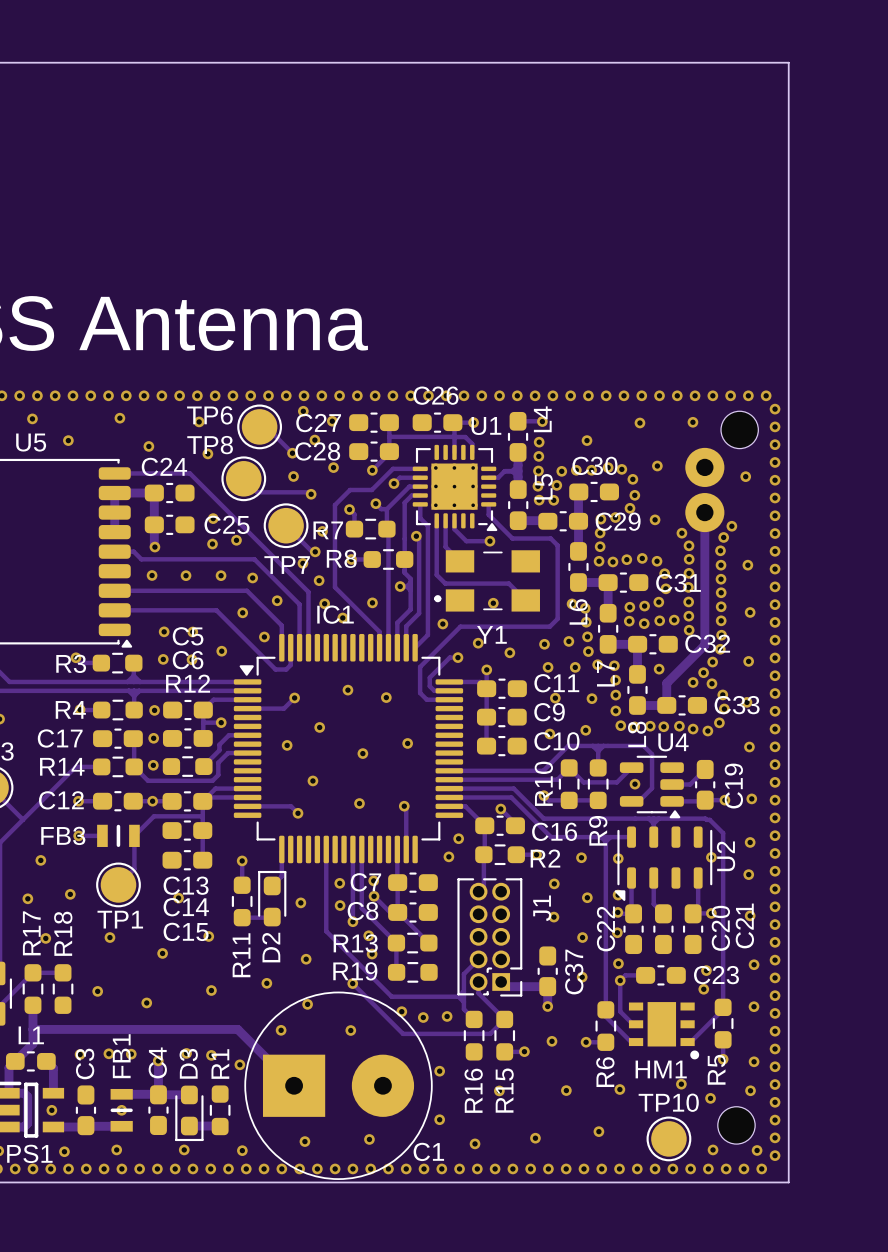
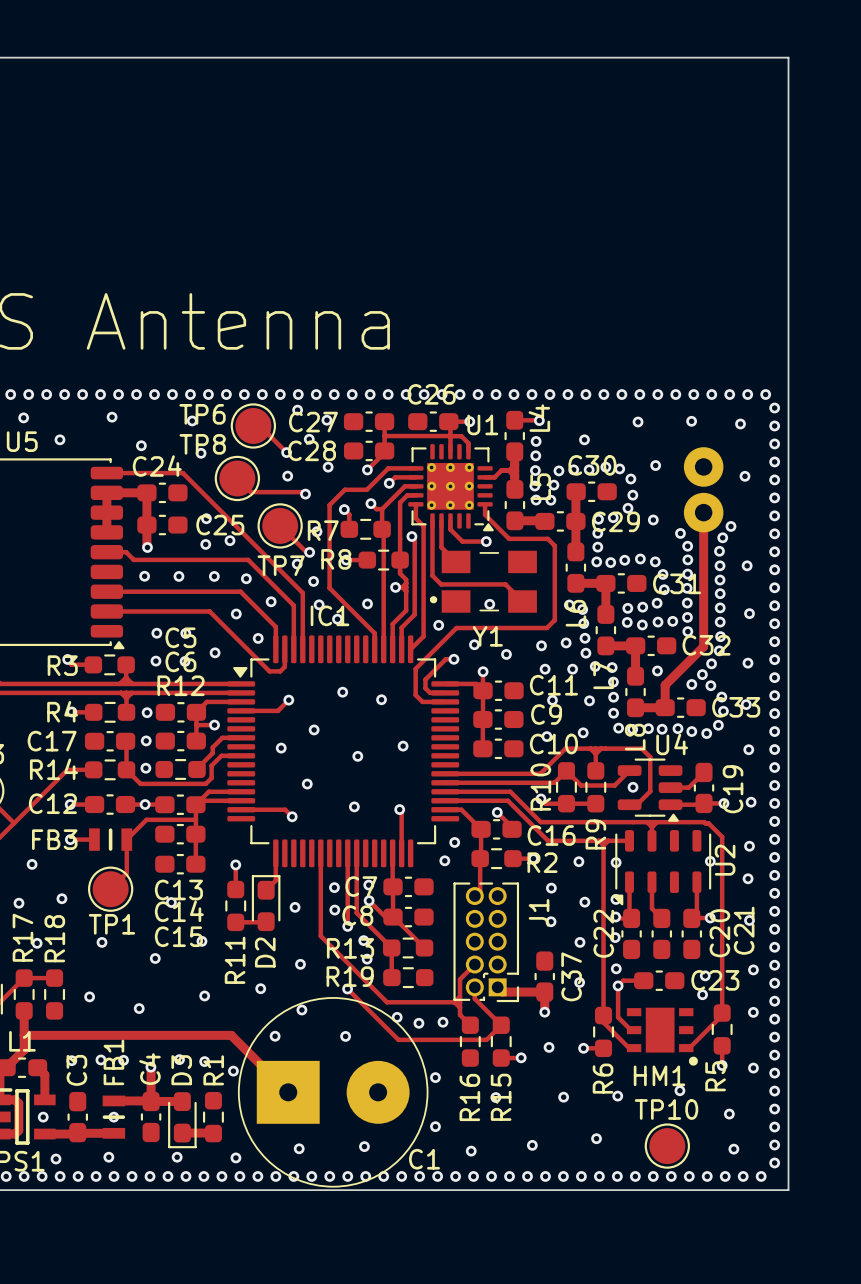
via: none -> (740, 424)
part: (739, 429) -> none
via: (750, 1090) -> none
via: (710, 1098) -> none
via: none -> (729, 1114)
part: (736, 1125) -> none
via: none -> (733, 1149)
via: (713, 1149) -> none
via: (757, 1150) -> none

